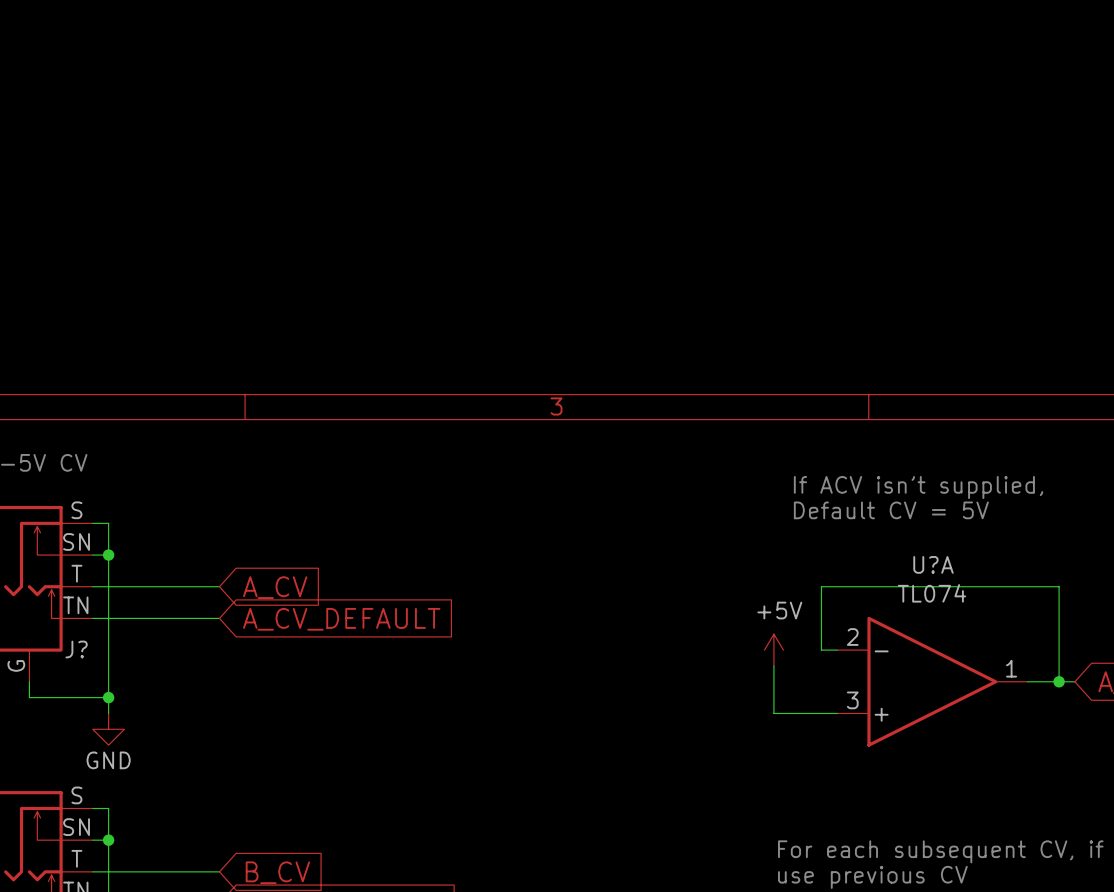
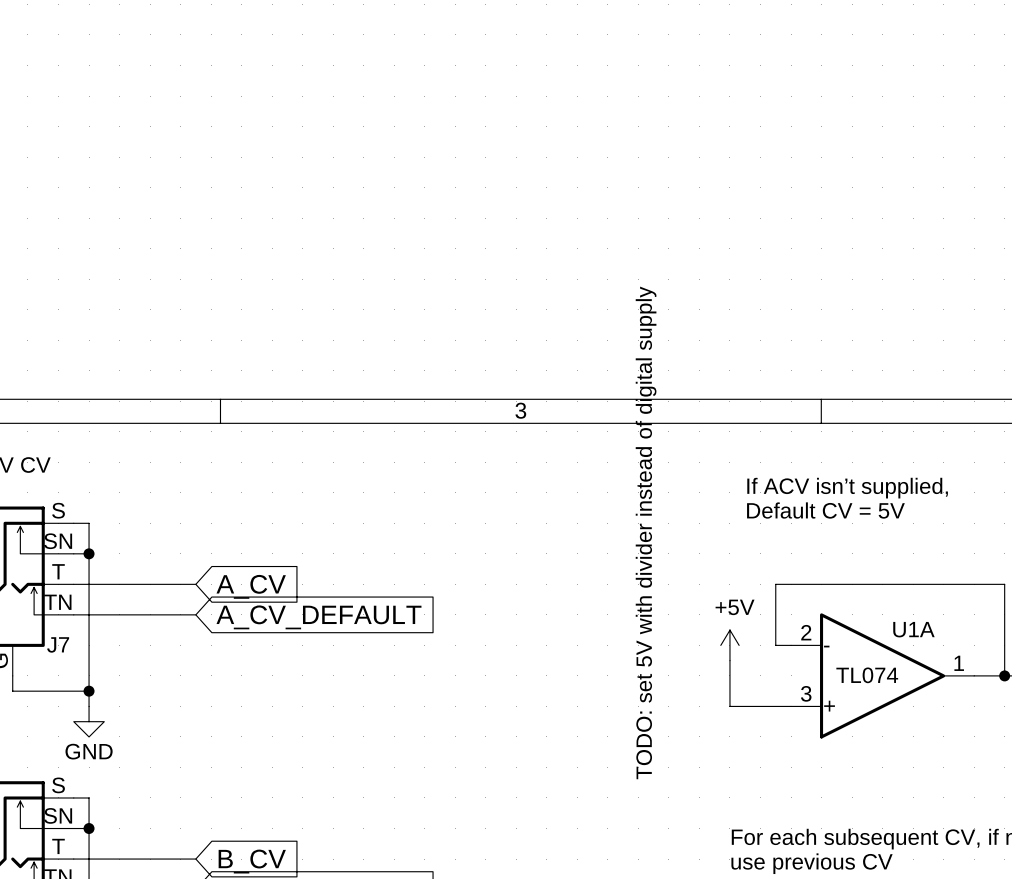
text: none -> TODO: set 5V with divider instead of digital supply (646, 532)
U?A name: U?A (933, 564) -> U1A (913, 629)
U?A value position: TL074 (931, 593) -> TL074 (867, 675)
J? name: J? (76, 649) -> J7 (58, 644)

